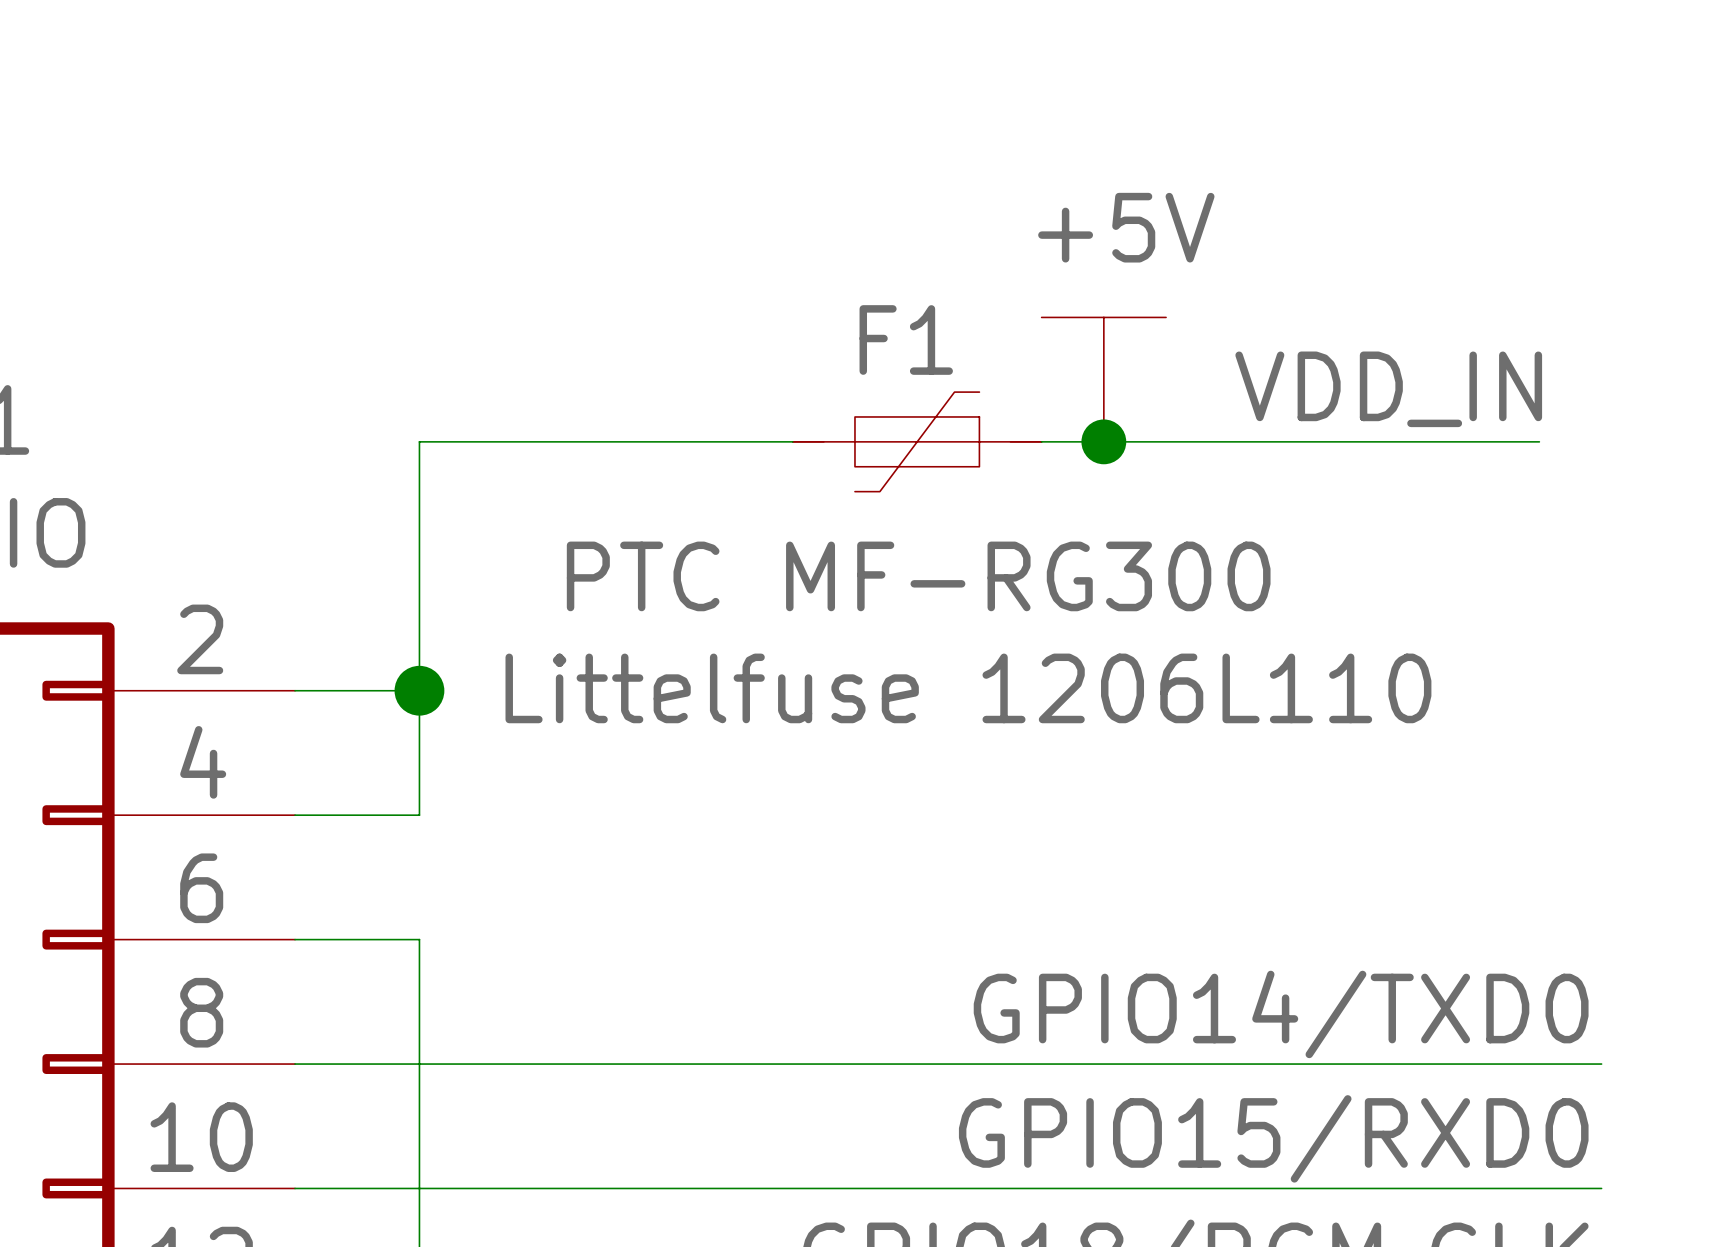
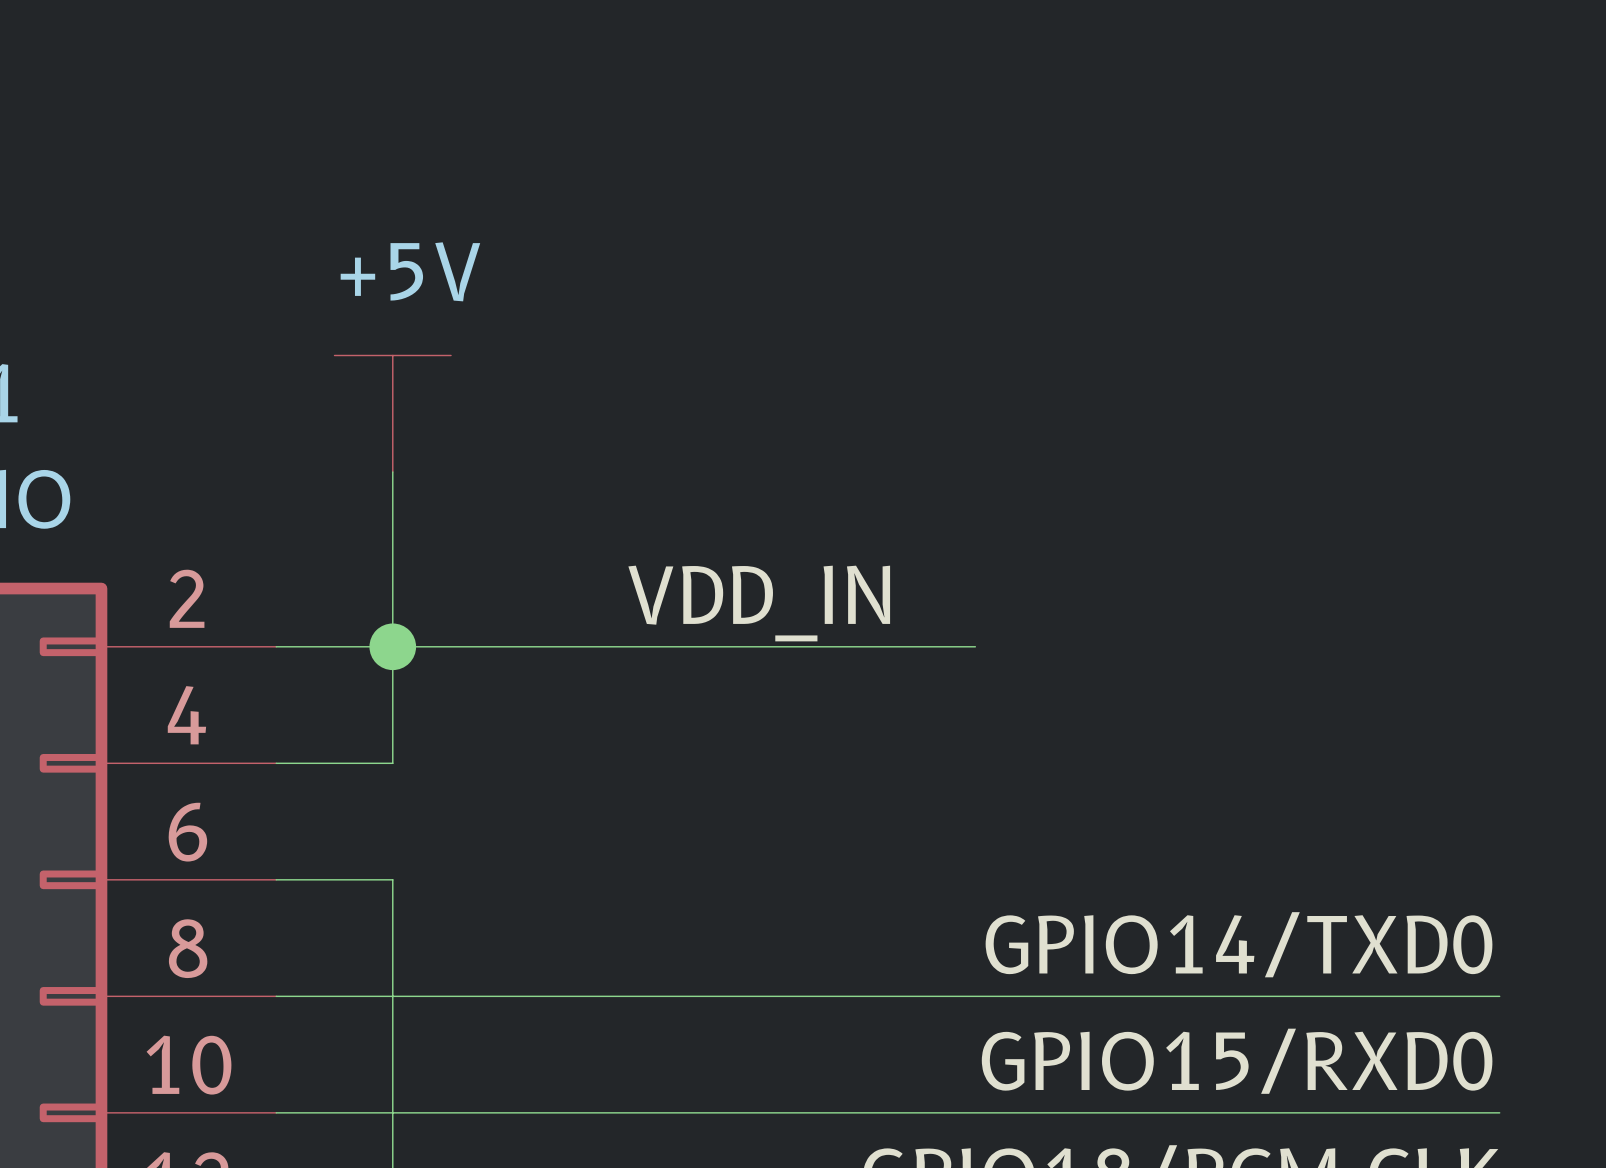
power symbol position: +5V (1103, 379) -> +5V (392, 413)
label position: VDD_IN (1388, 389) -> VDD_IN (759, 603)
wire: (792, 441) (419, 441) (419, 504) -> none
F1: PTC MF-RG300 (917, 441) -> none
wire: (1041, 441) (1539, 441) -> none
junction: (1103, 441) -> none
wire: none -> (392, 646) (975, 646)

